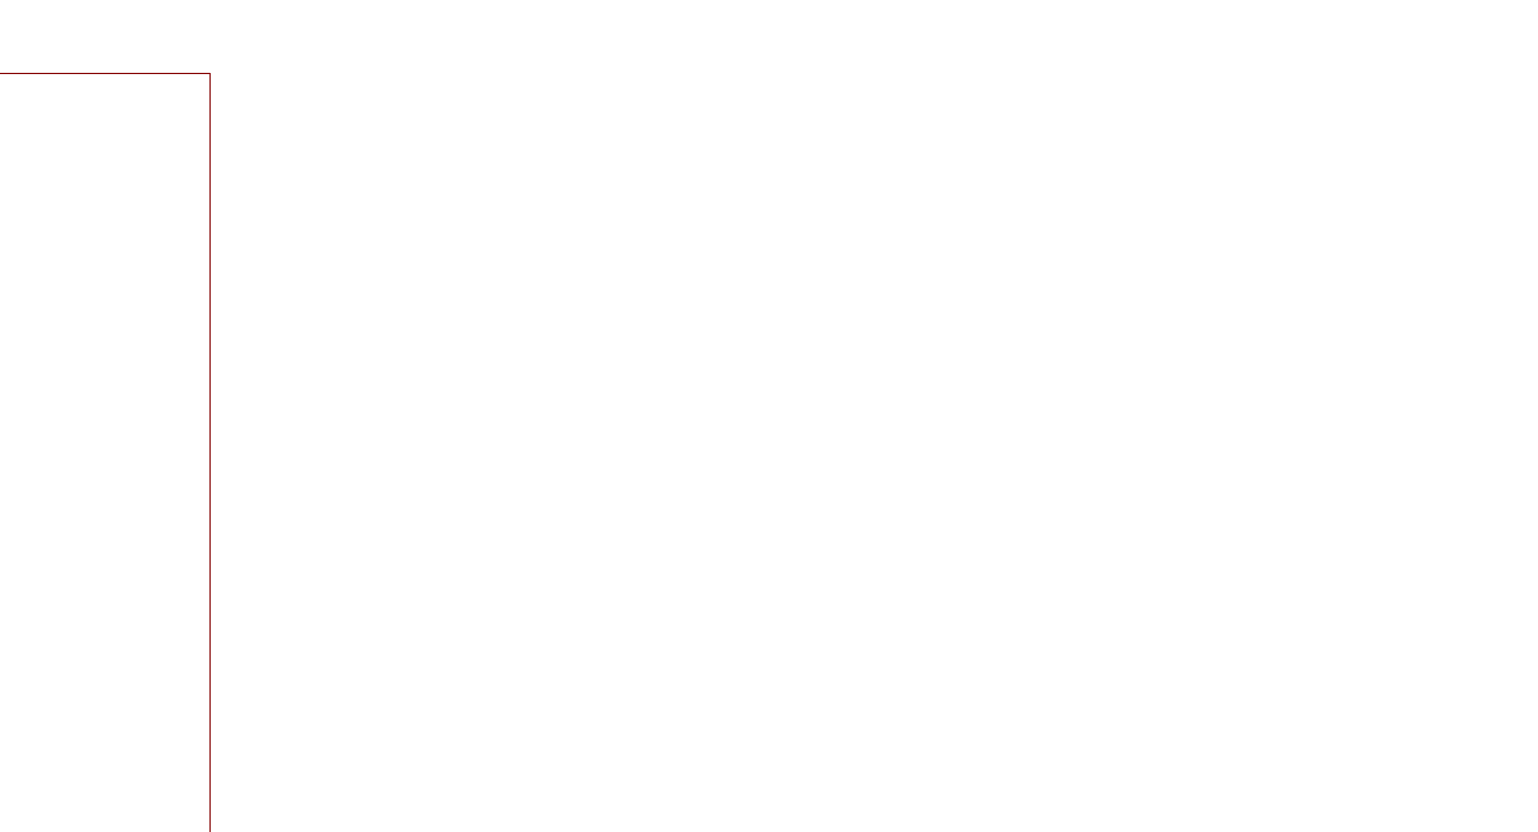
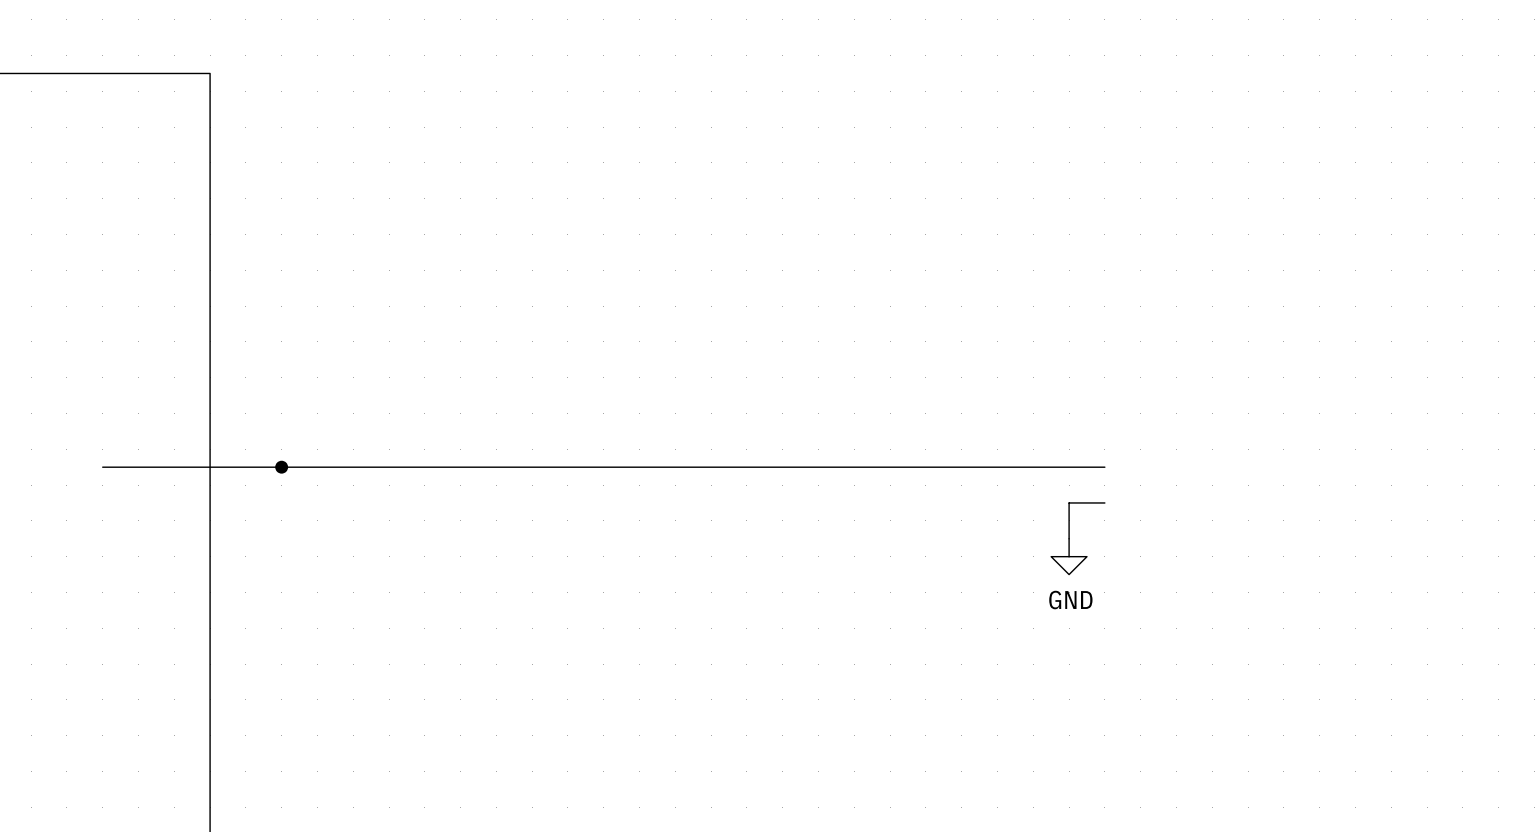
wire: none -> (102, 467) (1104, 467)
junction: none -> (281, 467)
wire: none -> (1104, 502) (1069, 502) (1069, 538)
power symbol: none -> GND (1069, 556)

